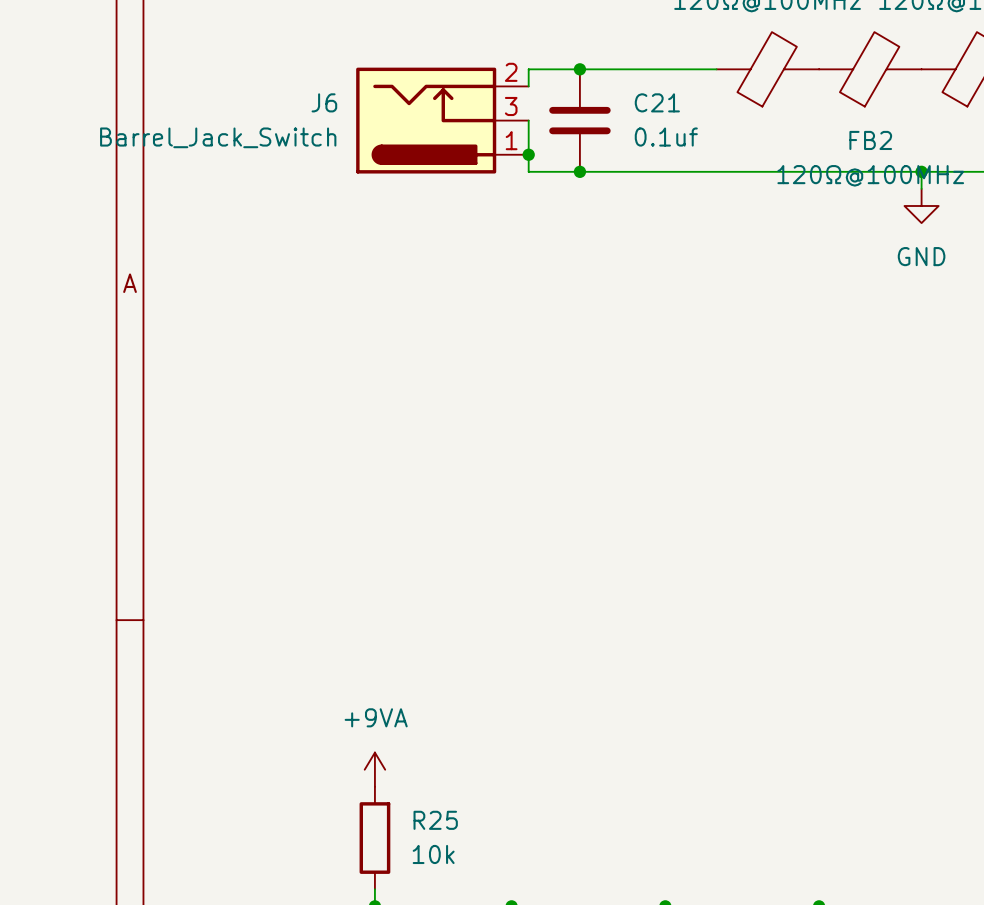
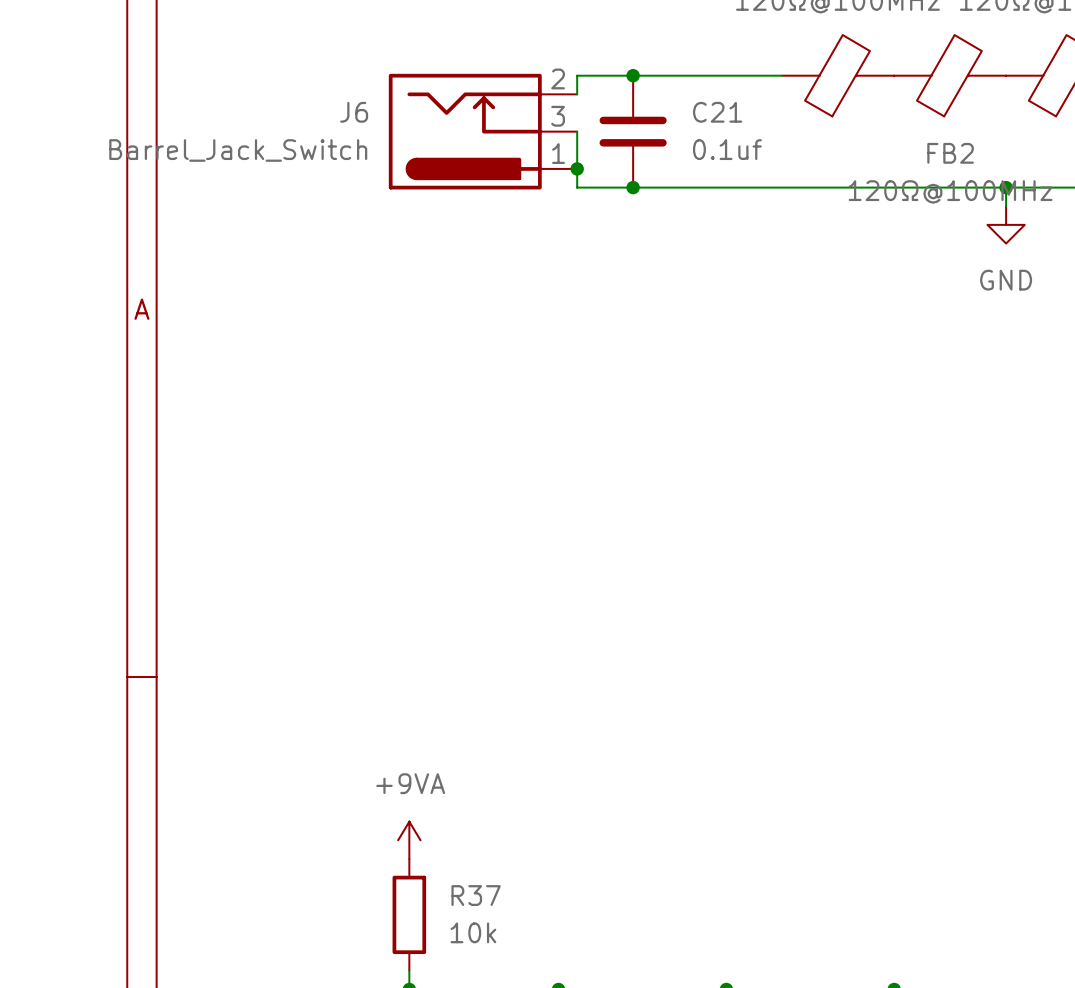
R25 name: R25 (435, 820) -> R37 (476, 895)

